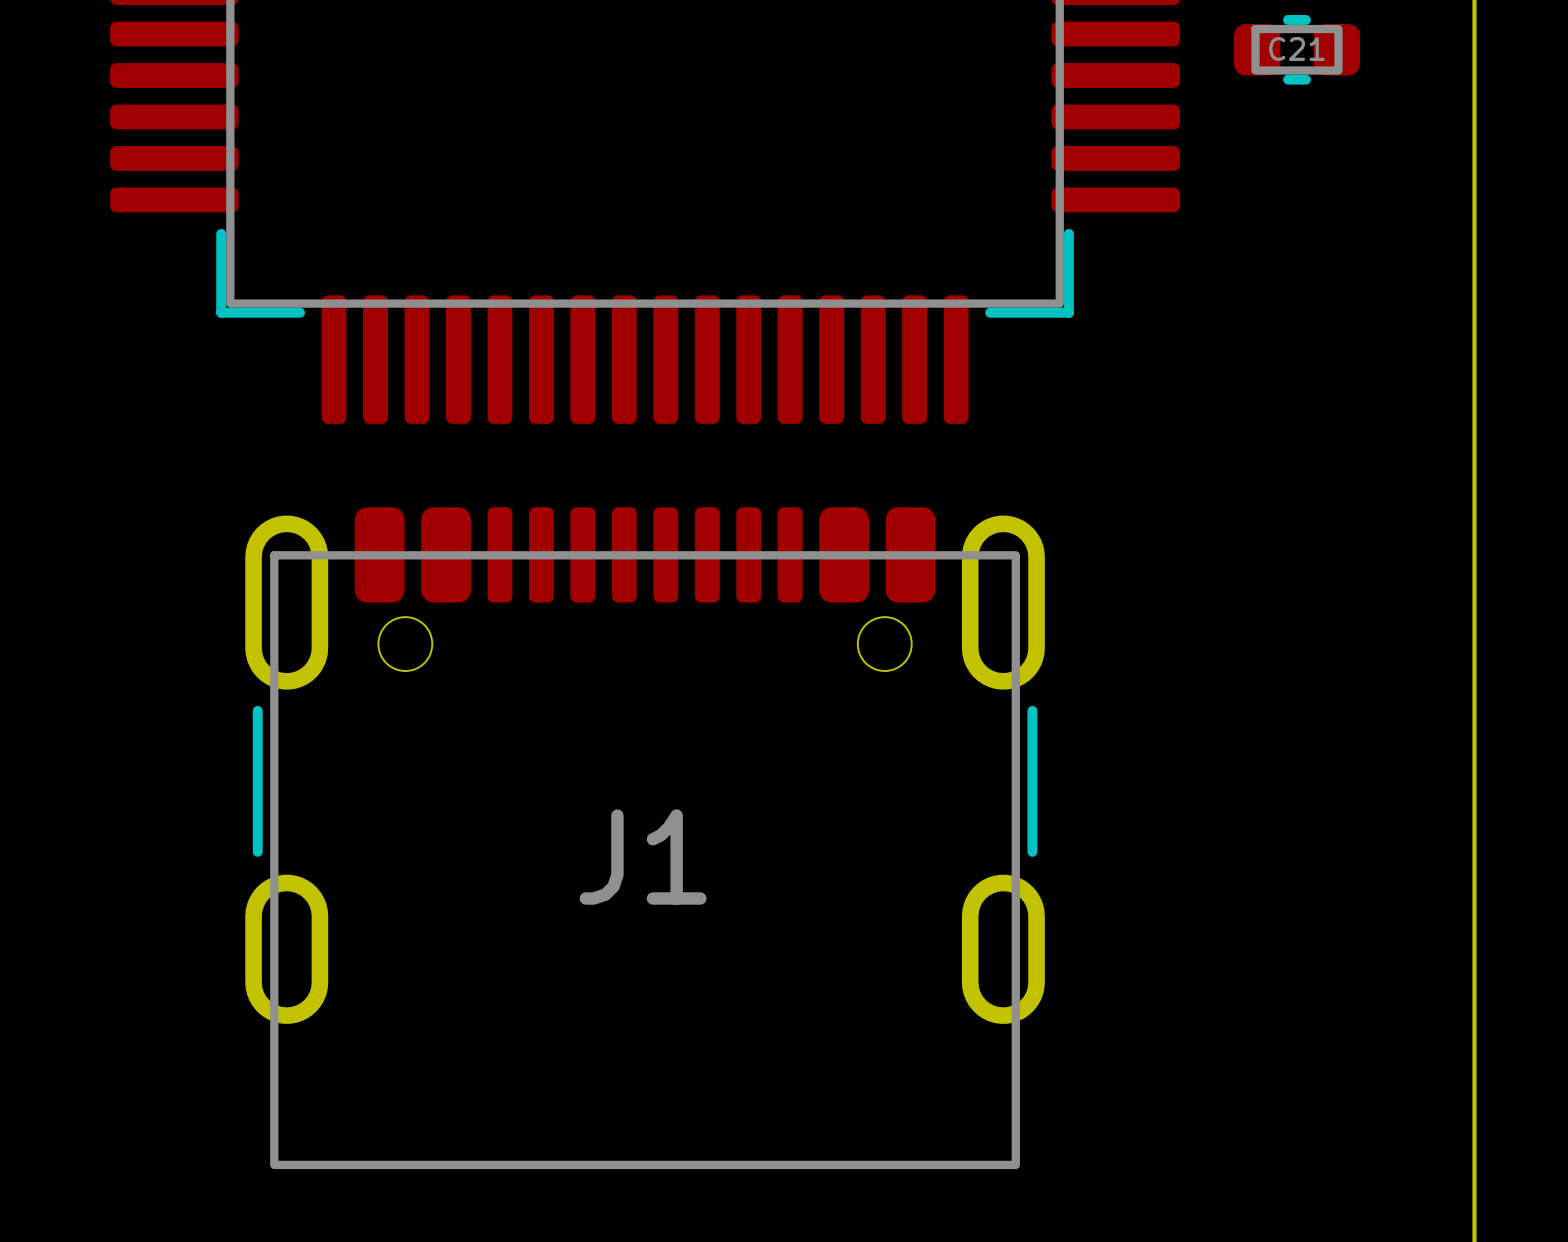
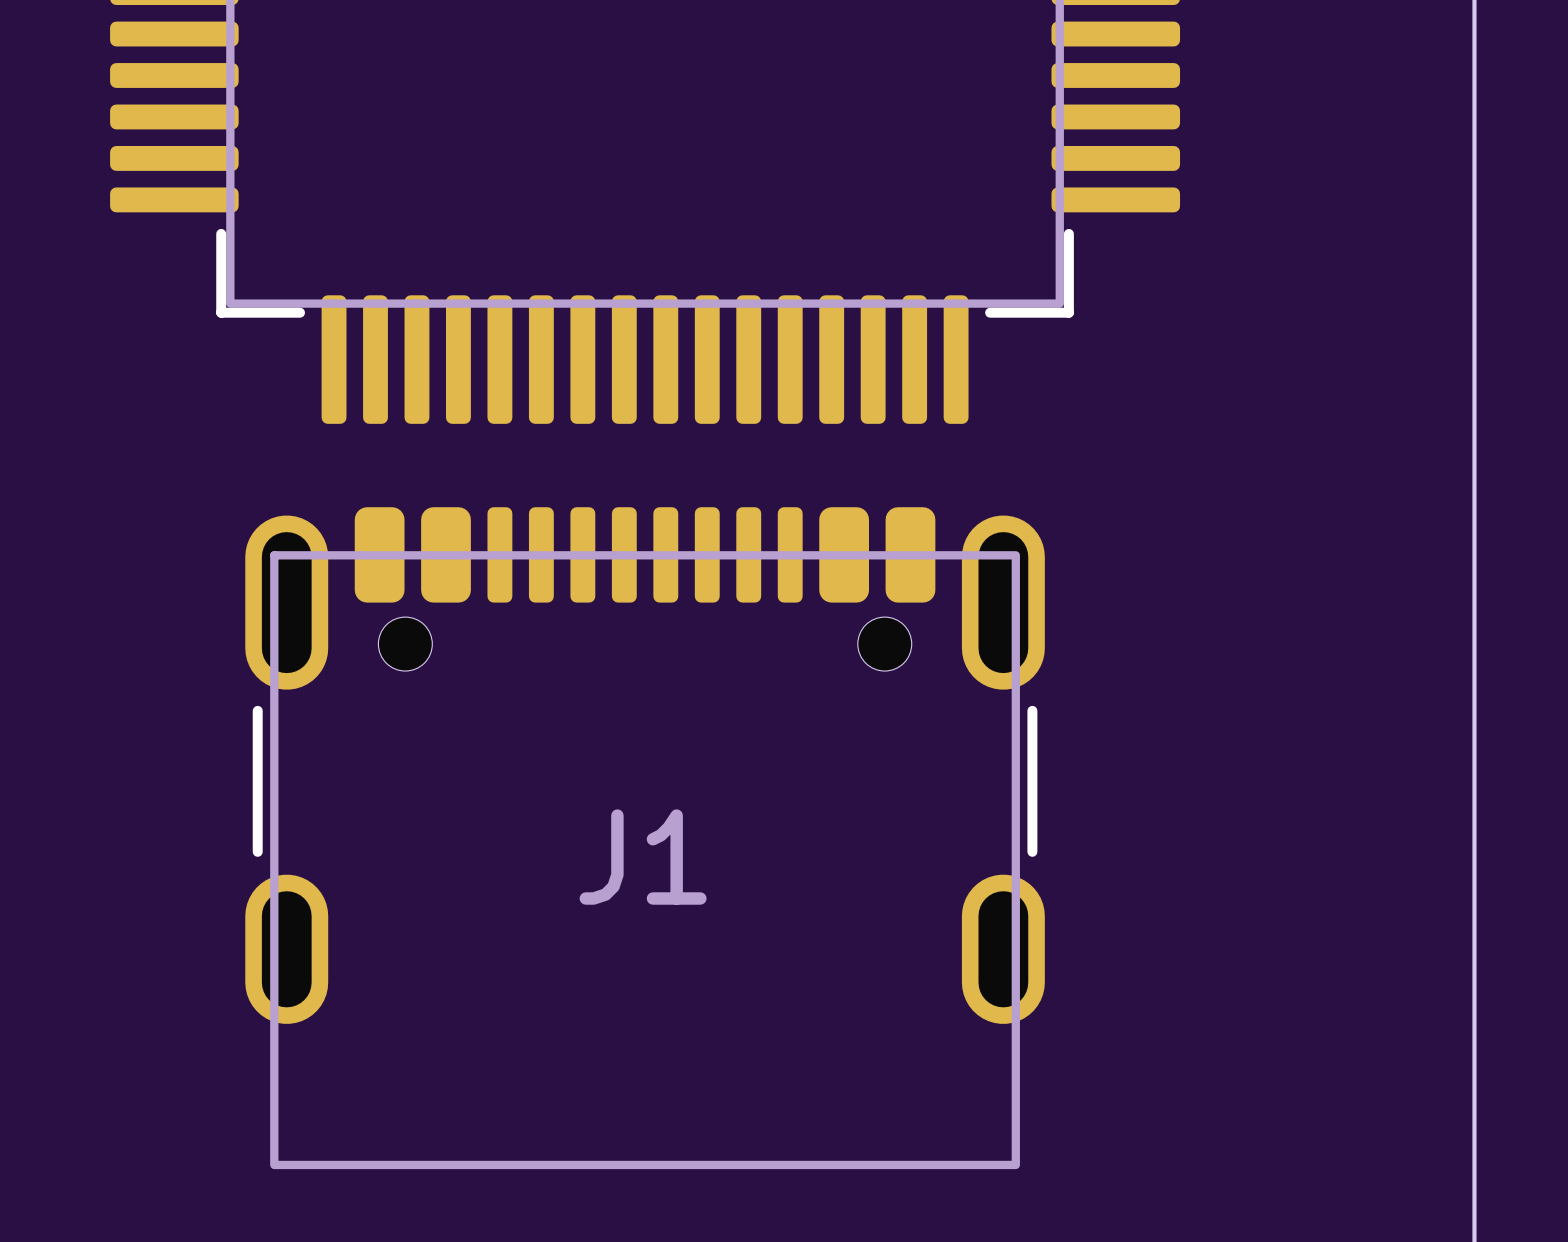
C21: (1296, 49) -> none

